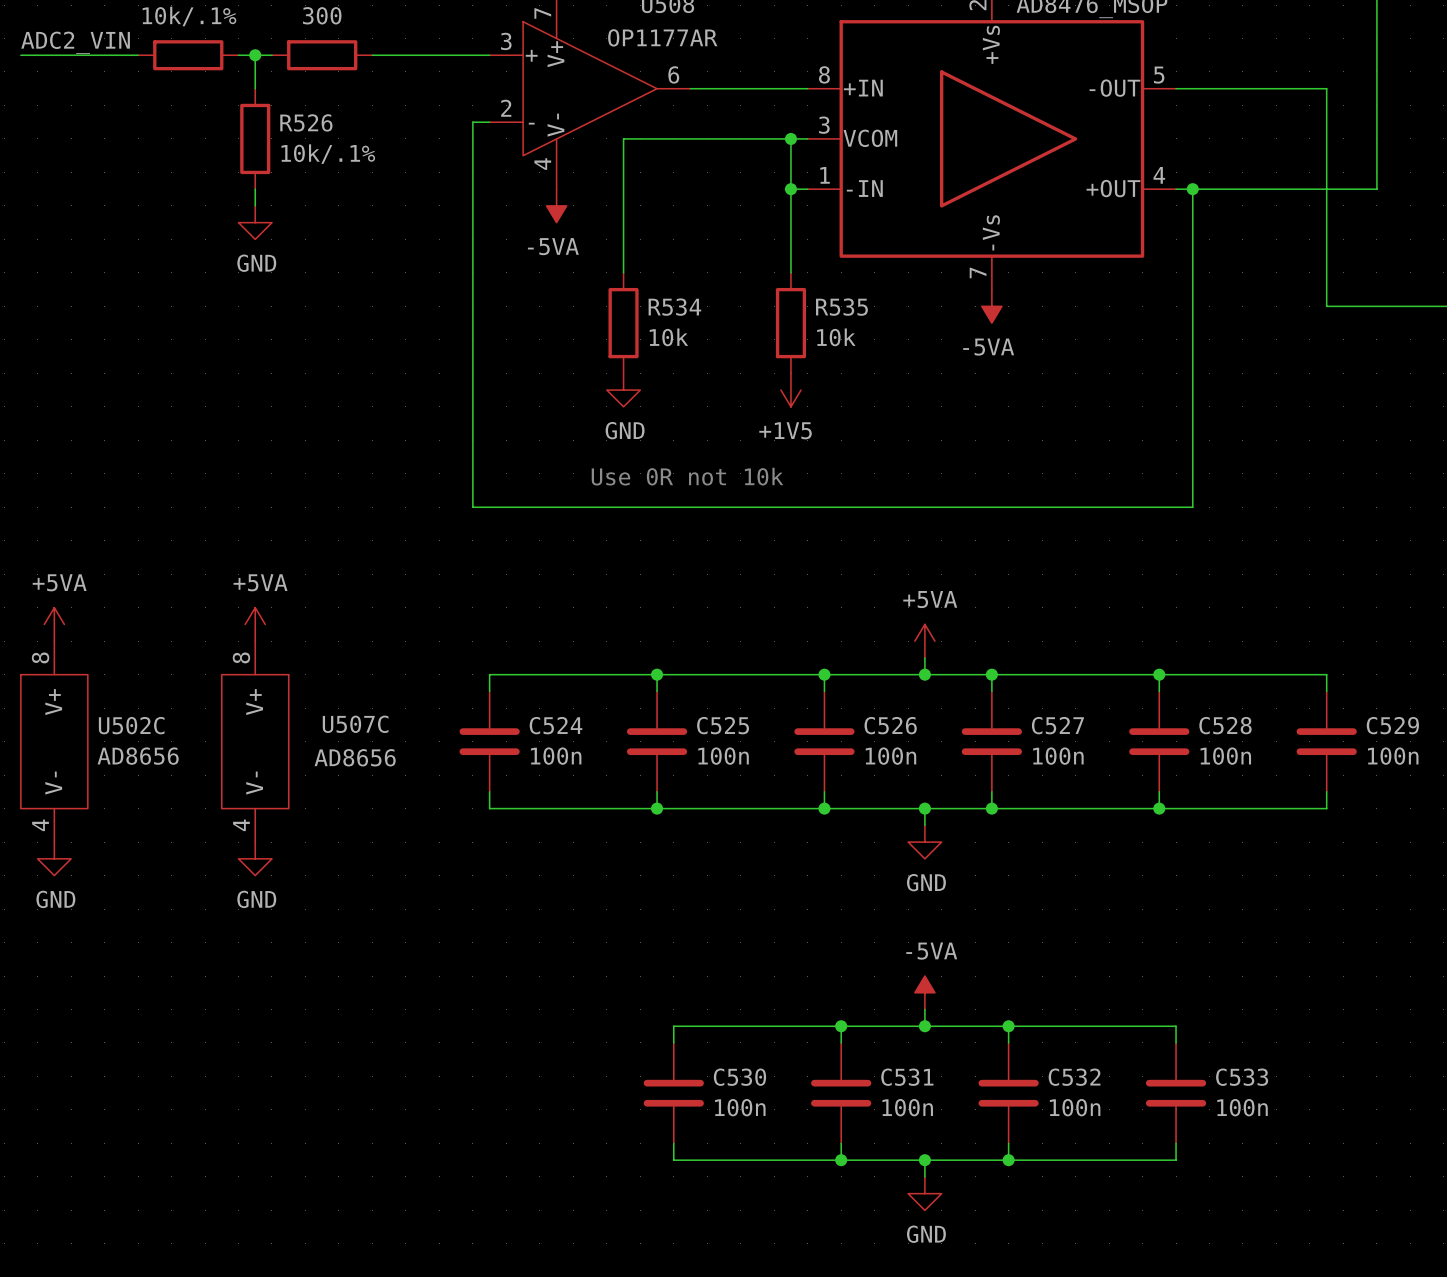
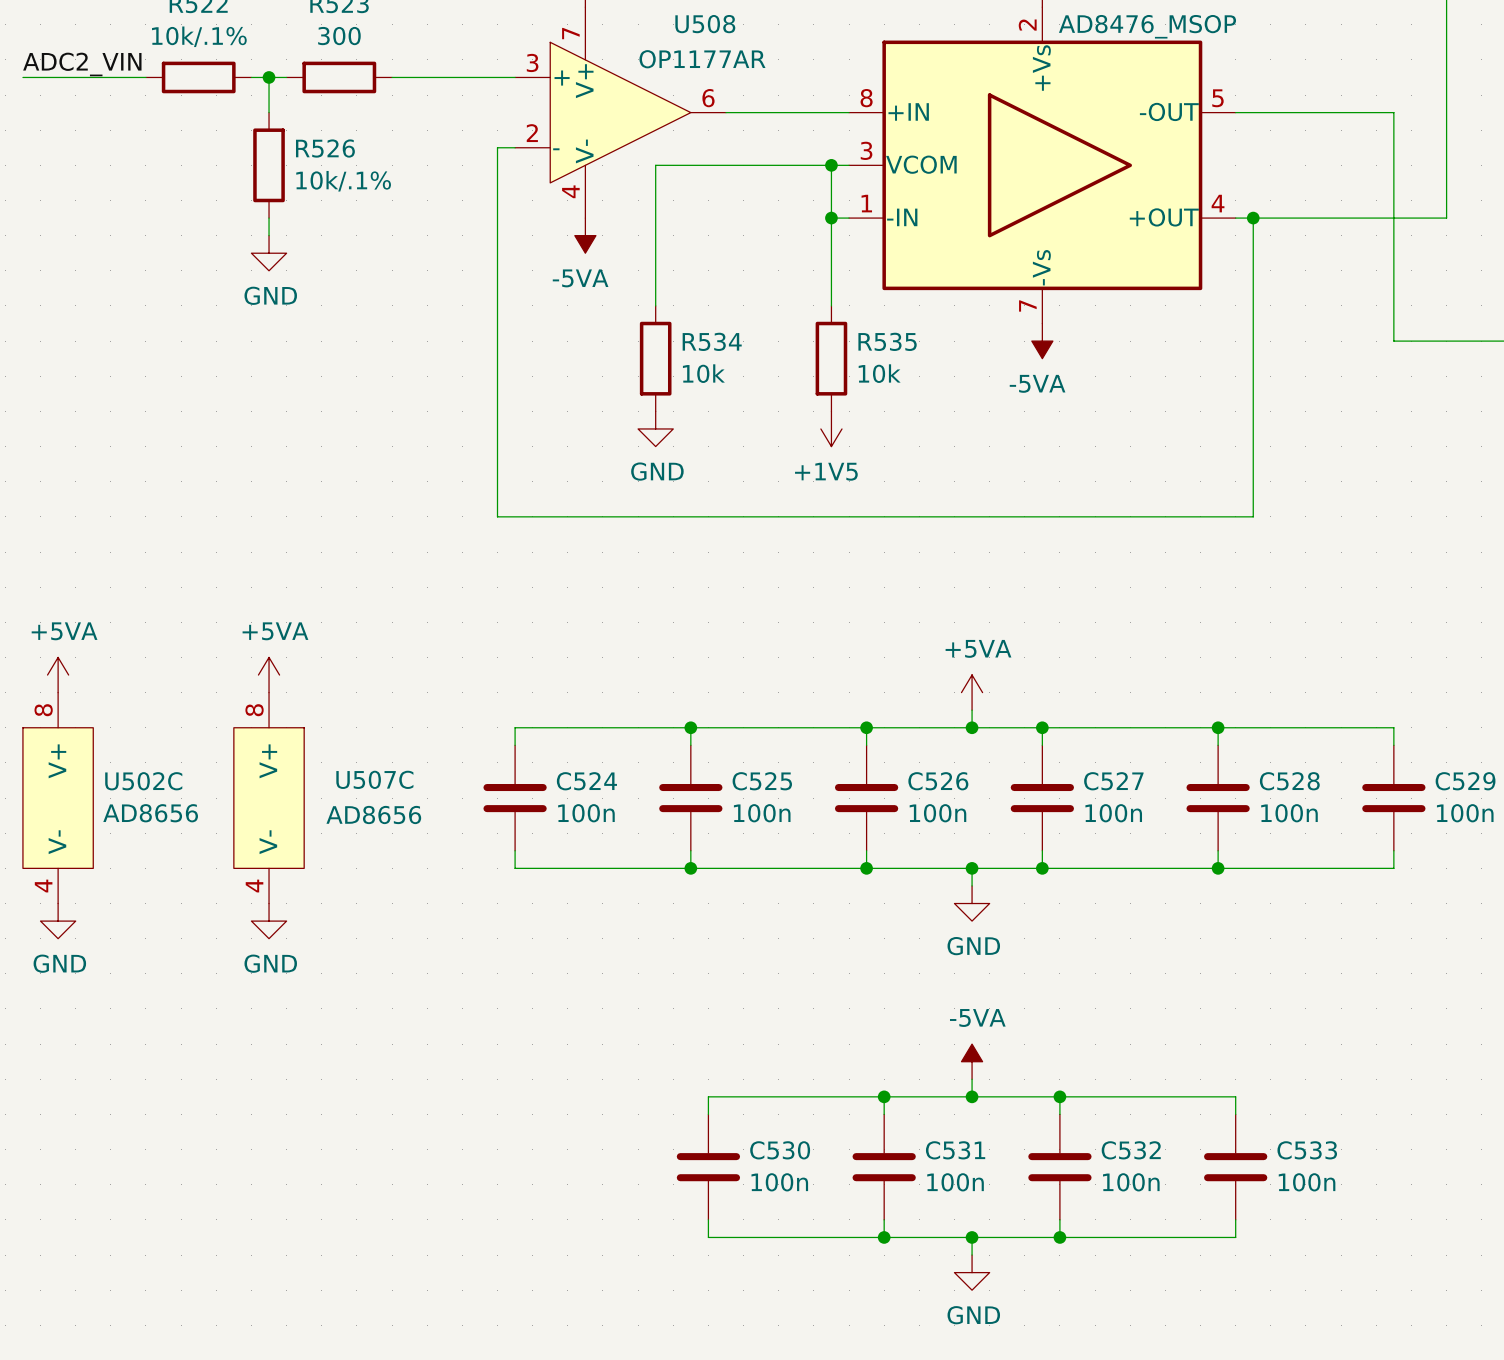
wire: (472, 473) (472, 507) (1192, 507) (1192, 473) -> (497, 516) (1253, 516)
text: Use 0R not 10k (687, 476) -> none

